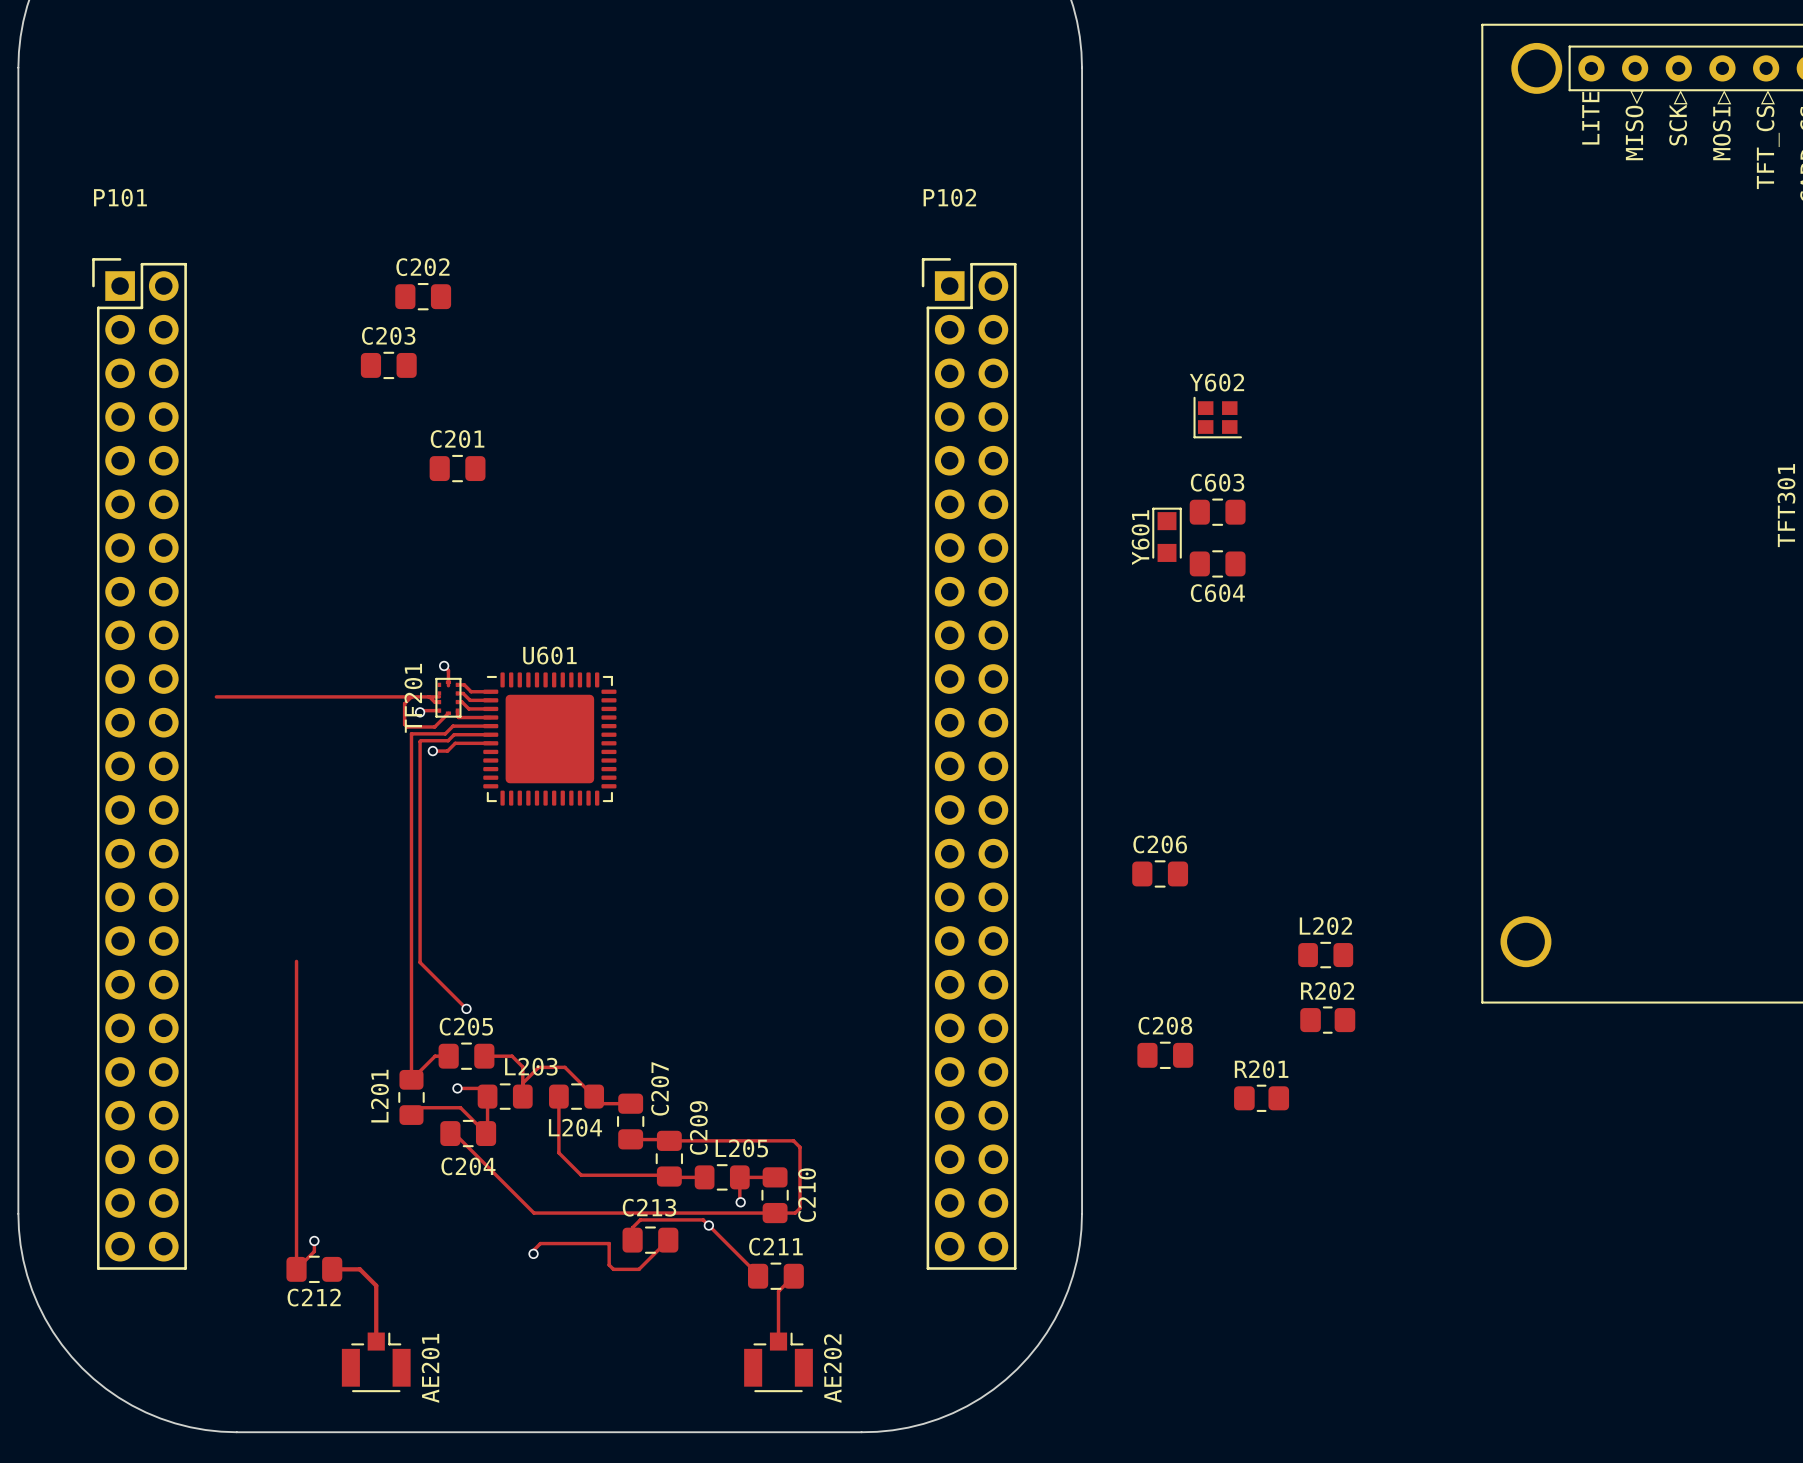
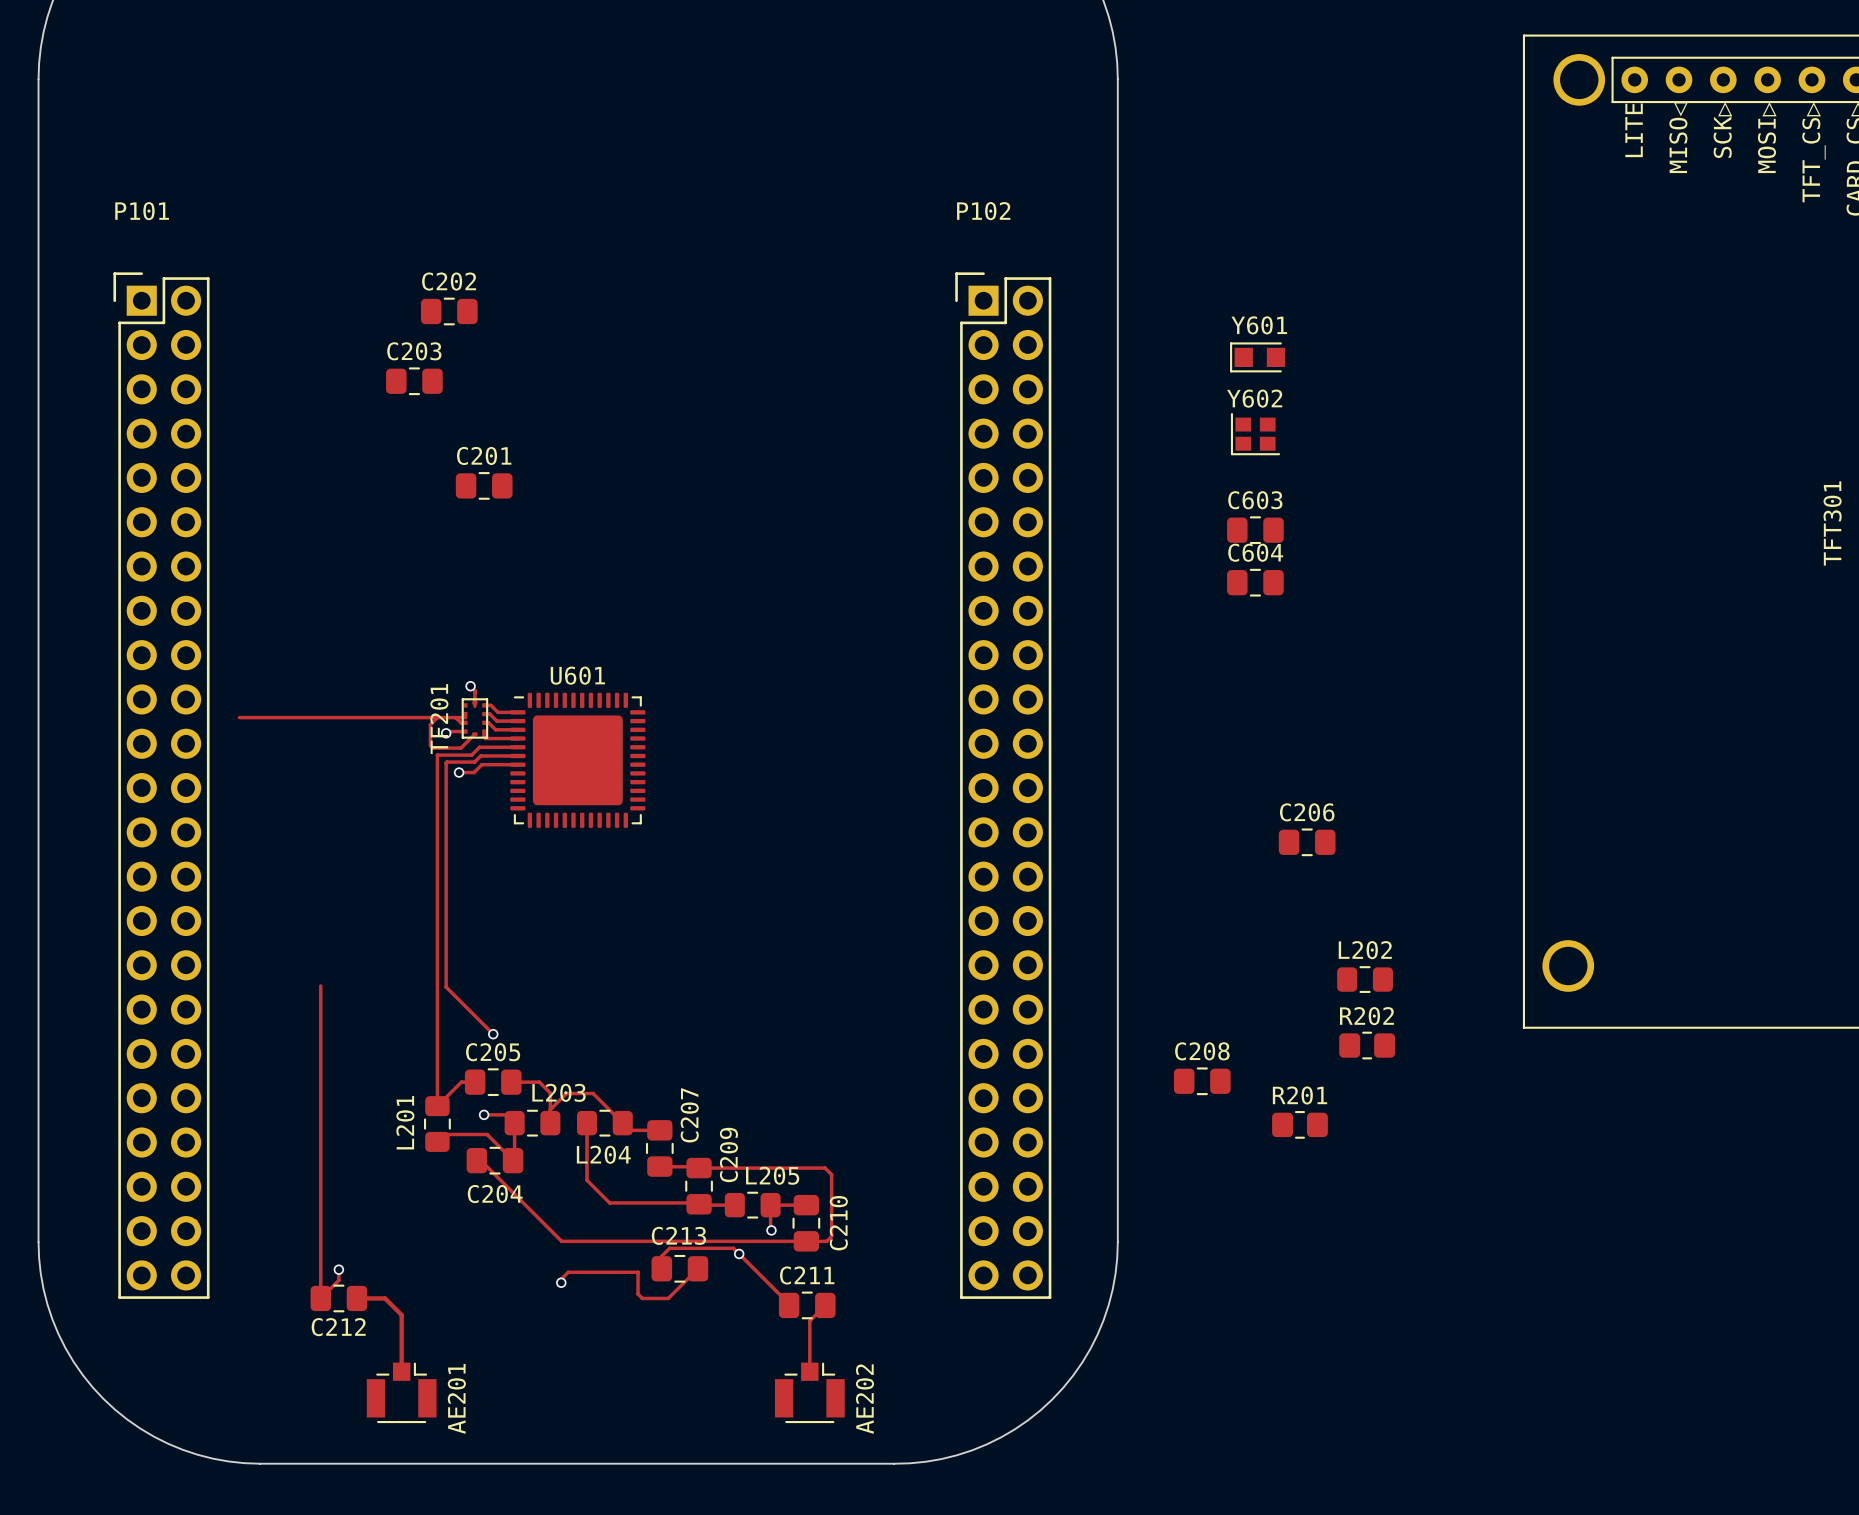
Y601 rotation: 0° (1167, 534) -> 90° counterclockwise (1257, 357)
Y601 position: (1167, 534) -> (1257, 357)
Y601 name position: Y601 (1140, 537) -> Y601 (1259, 325)
C604 name position: C604 (1217, 593) -> C604 (1255, 552)
C206 position: (1160, 873) -> (1307, 842)

